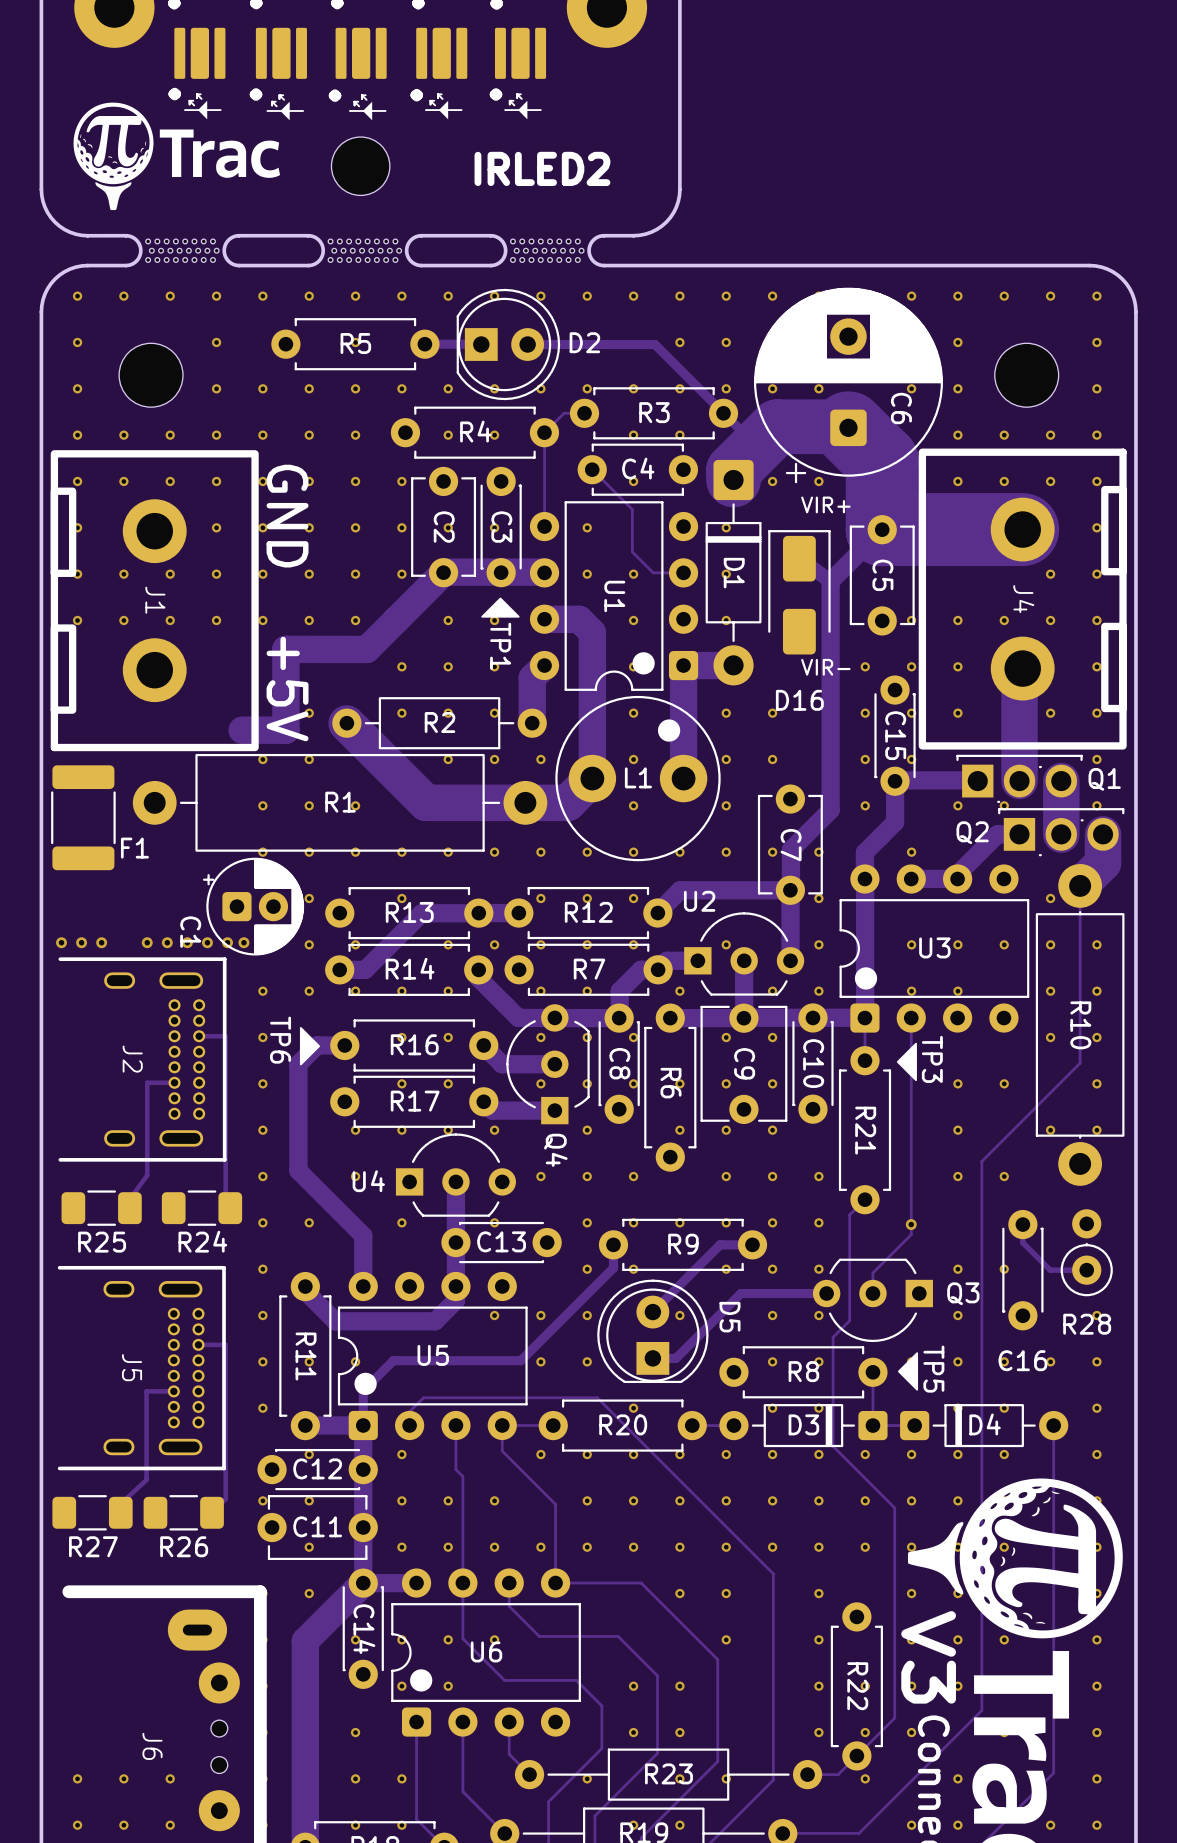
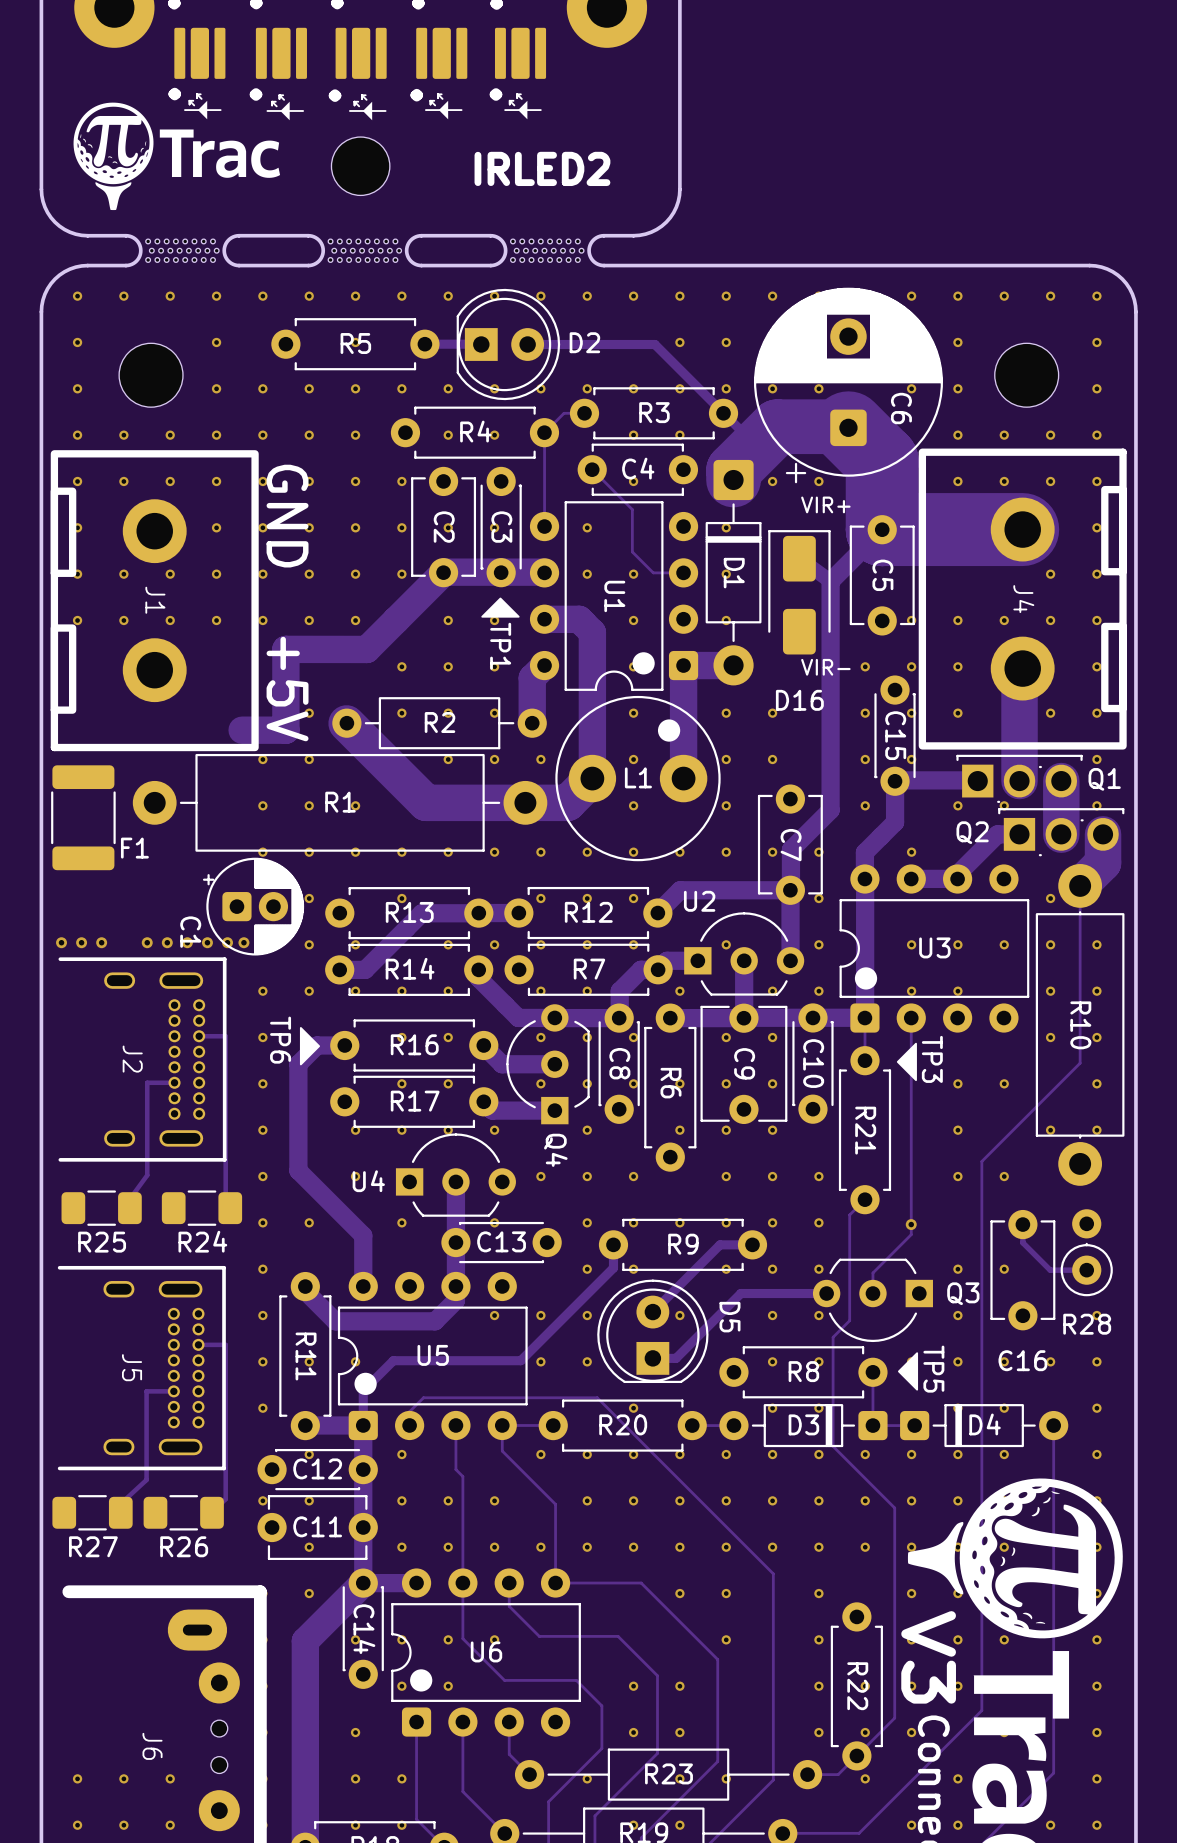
C16 footprint: [1002, 1209, 1044, 1331] -> [990, 1209, 1056, 1331]

